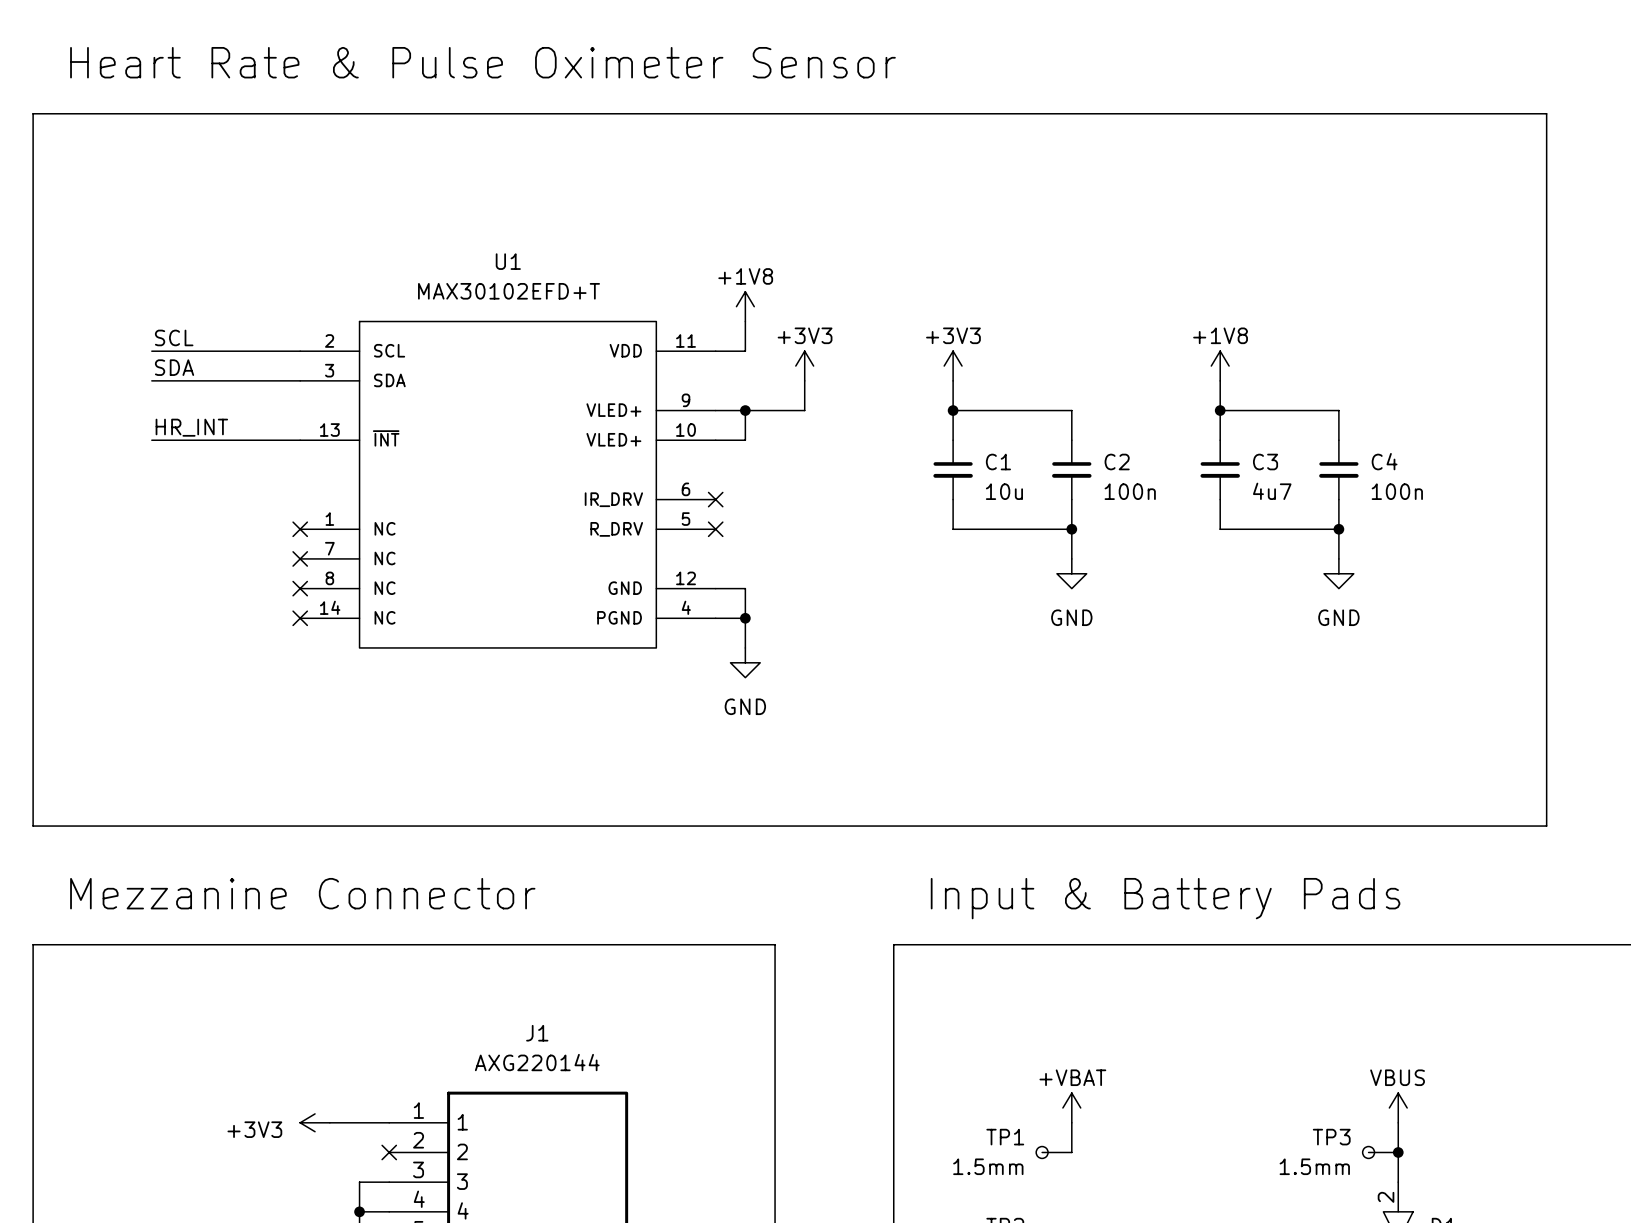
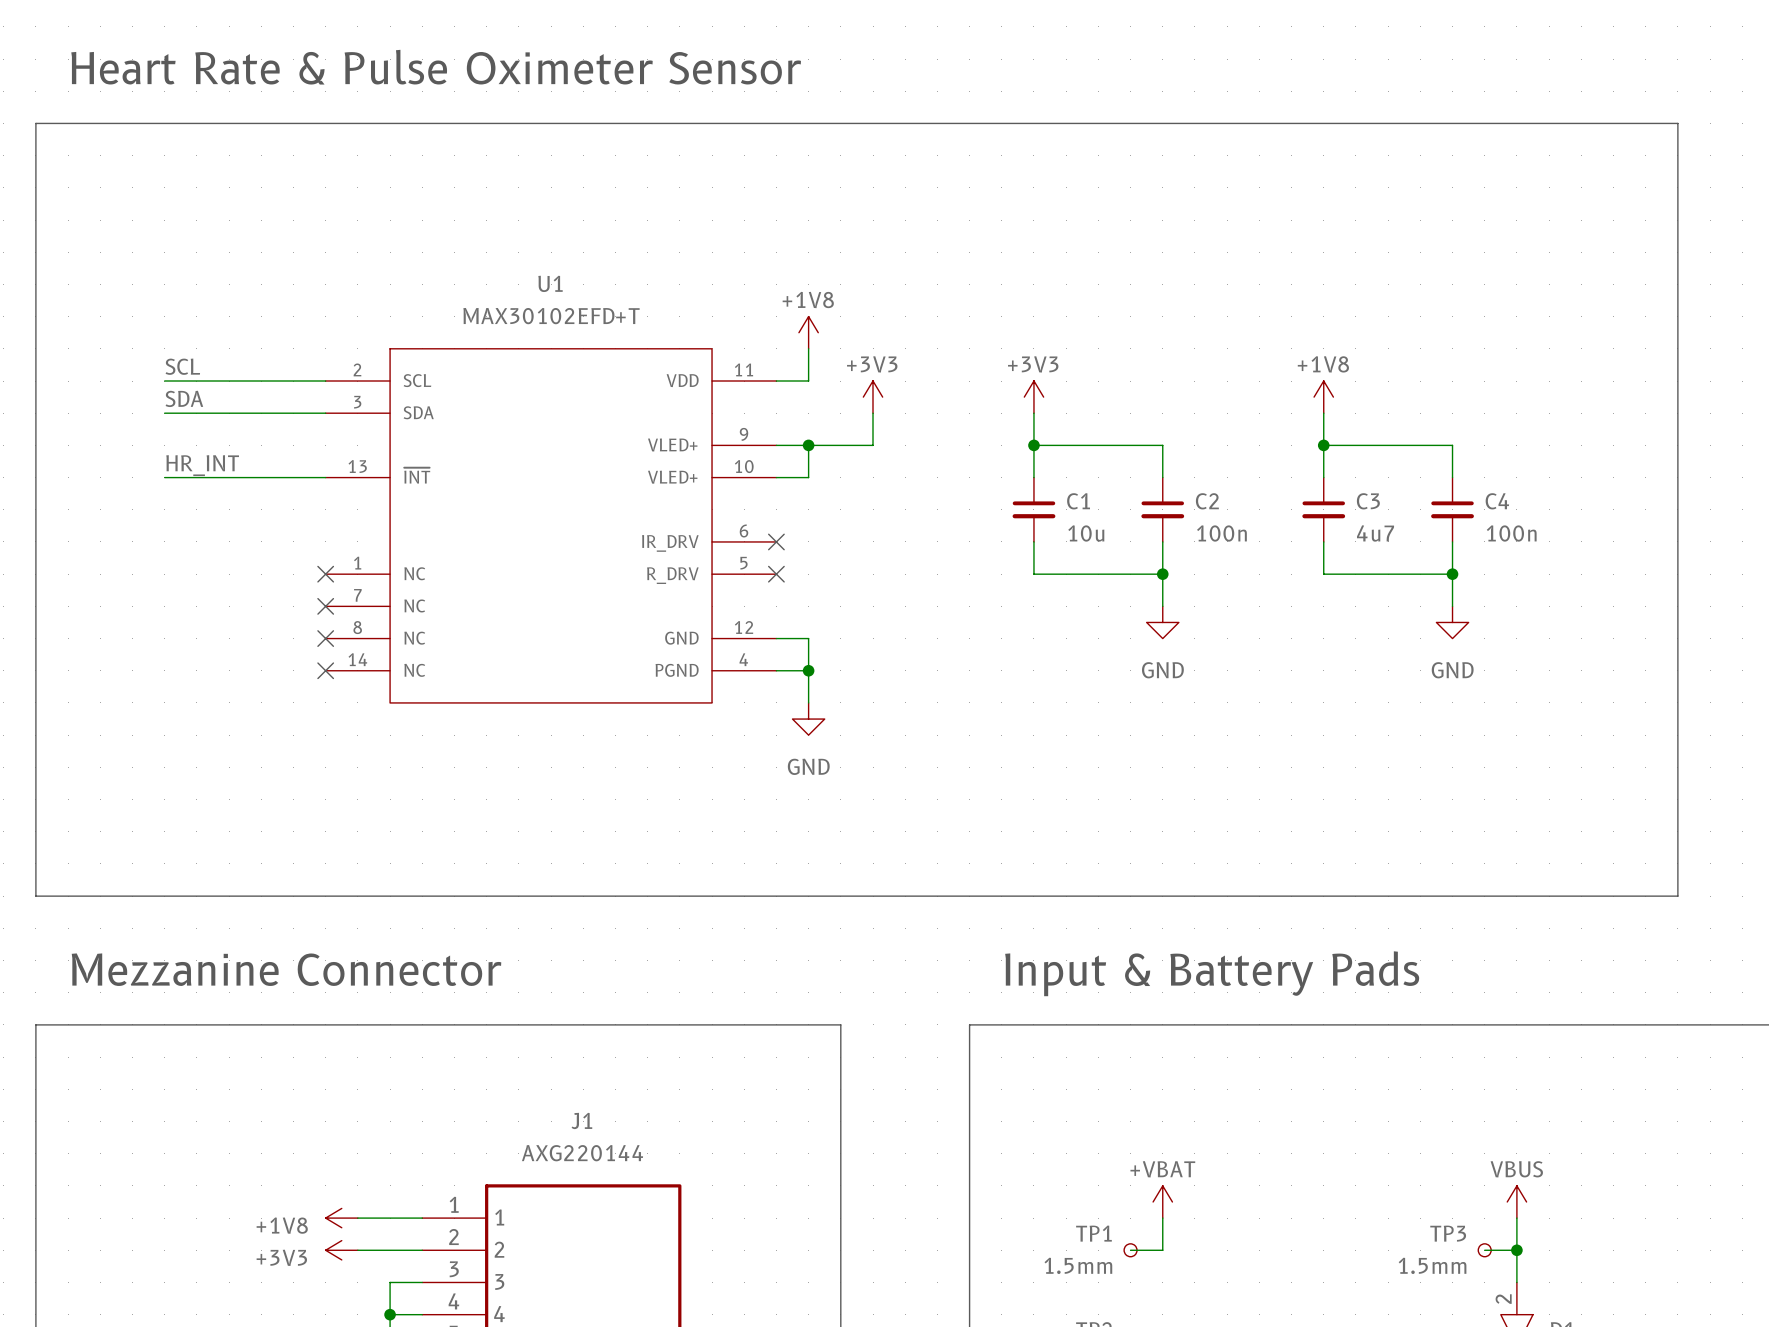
power symbol: +3V3 (315, 1122) -> +1V8 (341, 1218)
power symbol: none -> +3V3 (341, 1250)
wire: none -> (357, 1250) (422, 1250)
no-connect mark: (389, 1152) -> none

